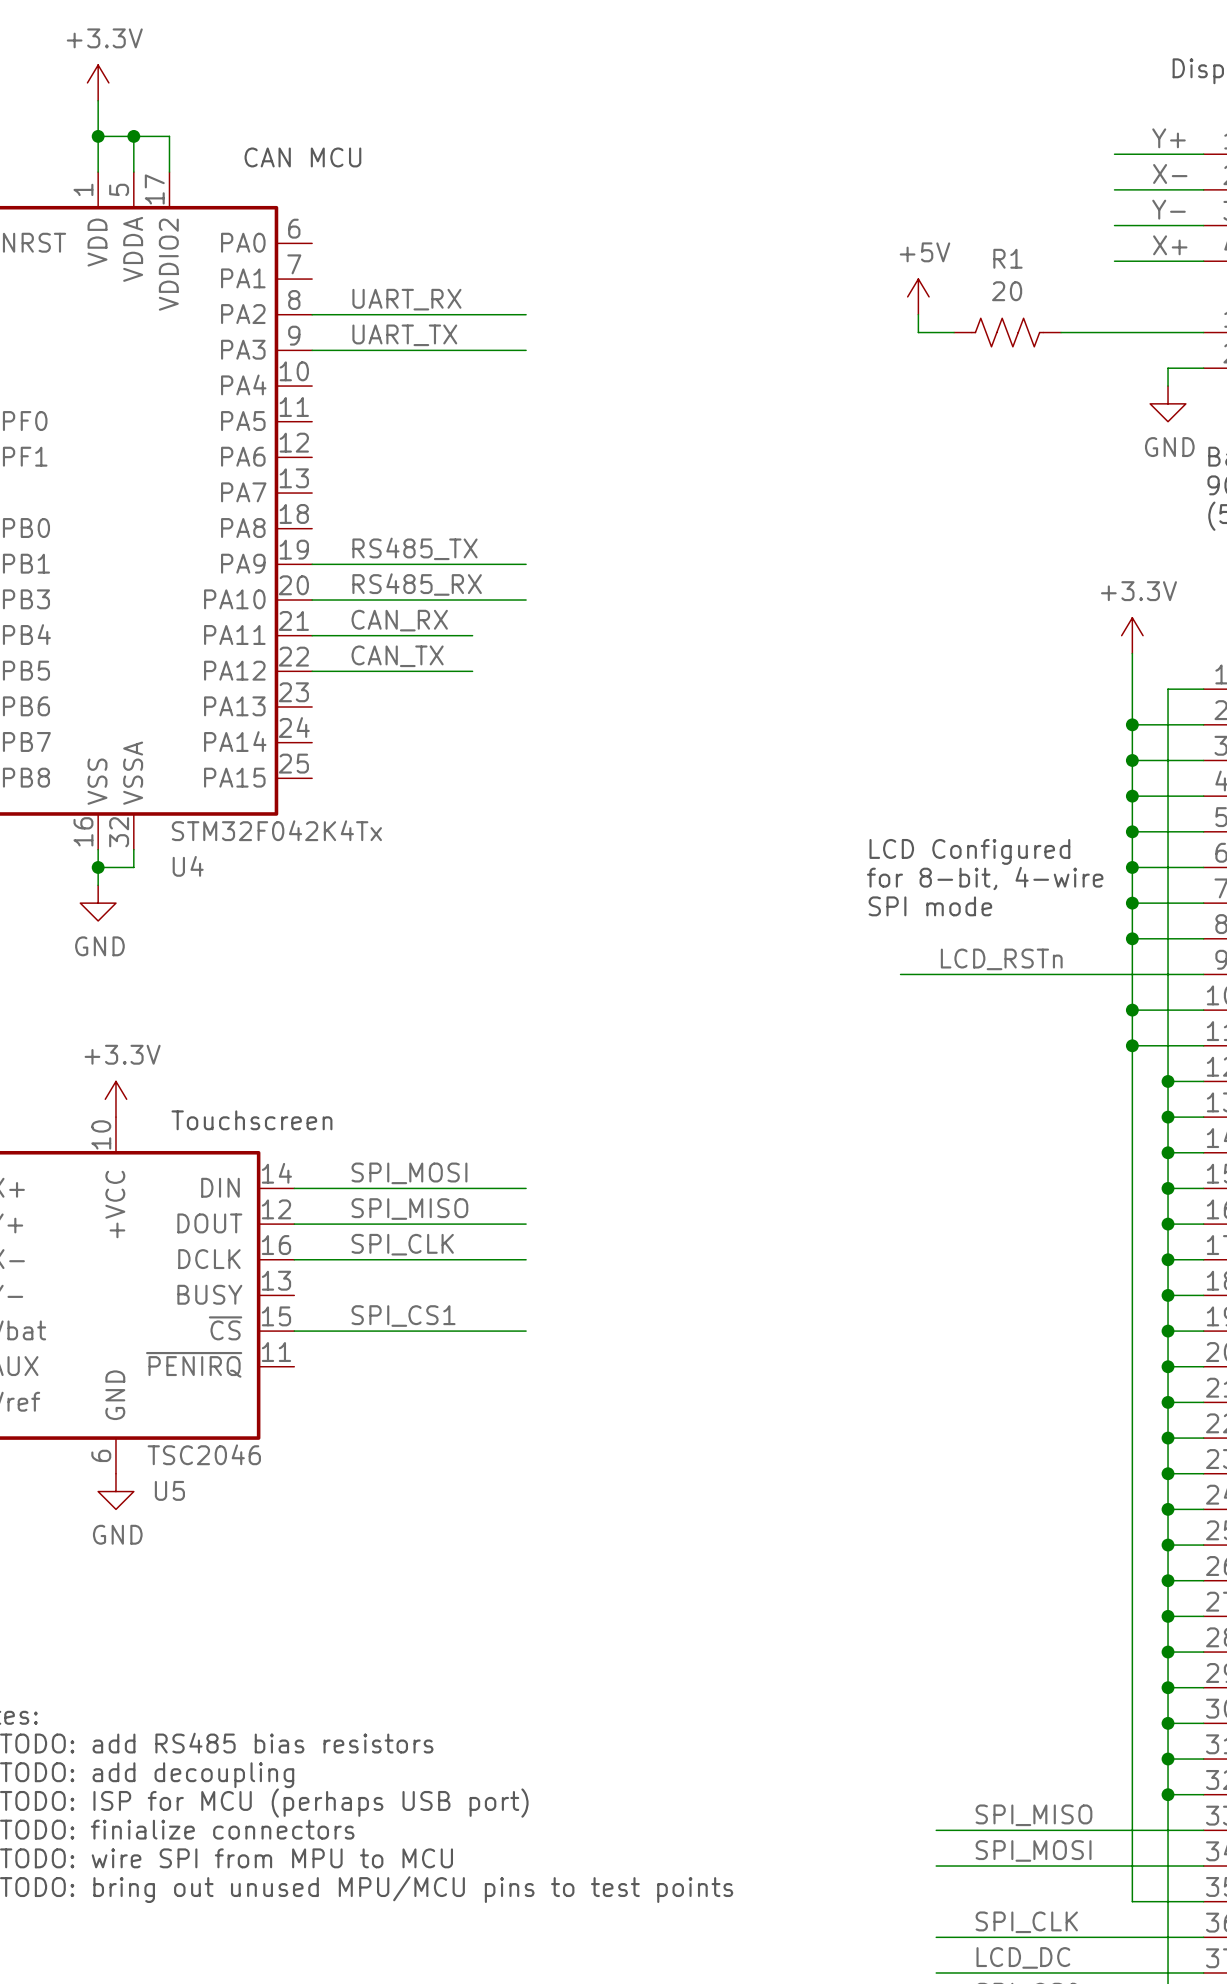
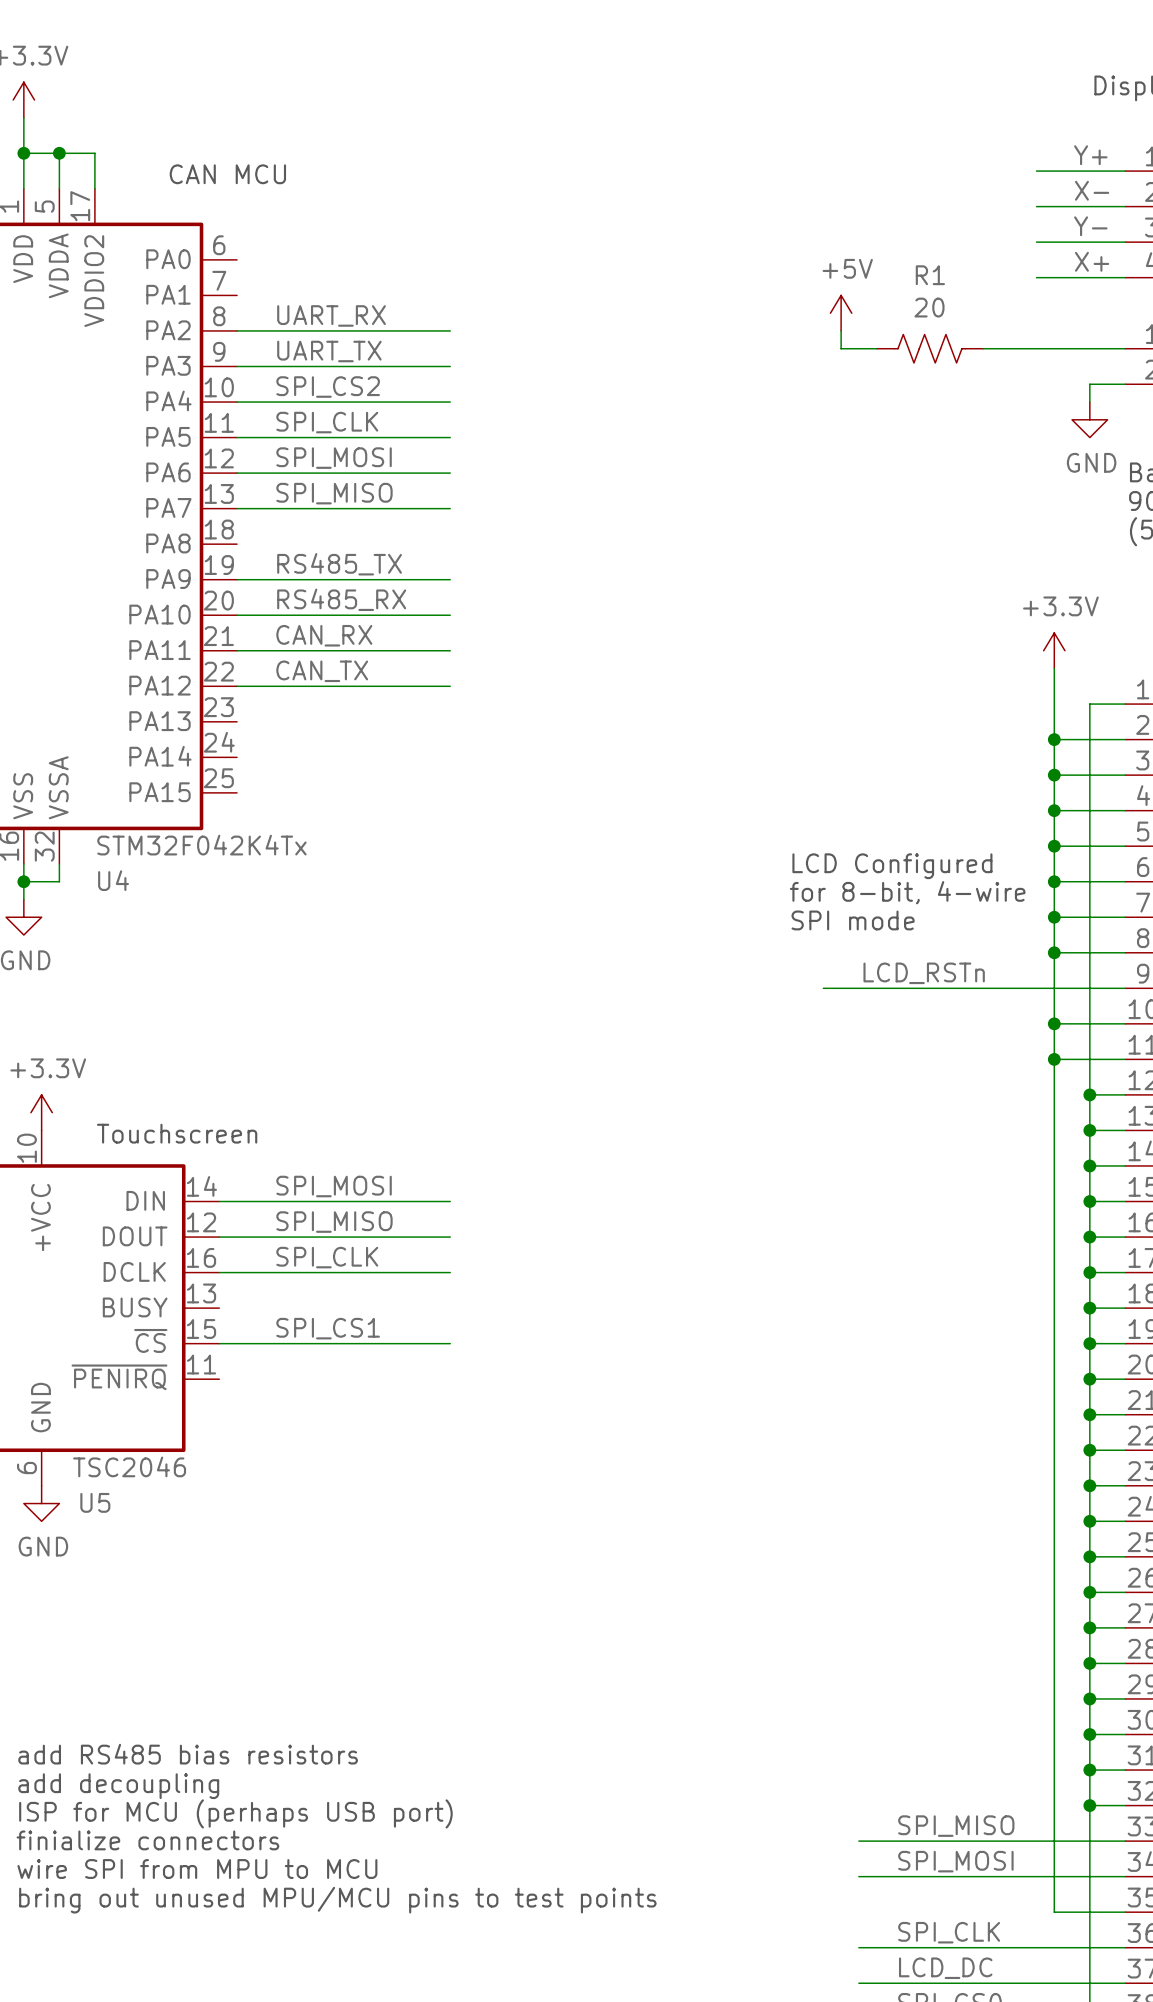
label: none -> SPI_CS2 (328, 387)
wire: none -> (237, 402) (450, 402)
label: none -> SPI_CLK (327, 422)
wire: none -> (237, 437) (450, 437)
label: none -> SPI_MOSI (334, 458)
wire: none -> (237, 473) (450, 473)
label: none -> SPI_MISO (334, 493)
wire: none -> (237, 508) (450, 508)
wire: none -> (396, 650) (450, 650)
wire: none -> (396, 686) (450, 686)

